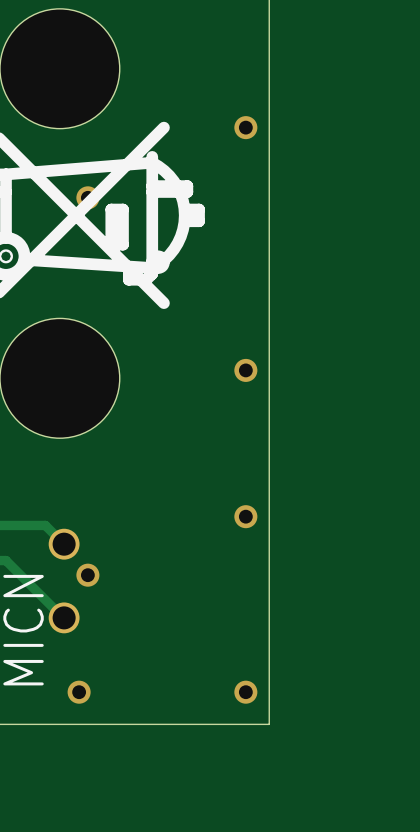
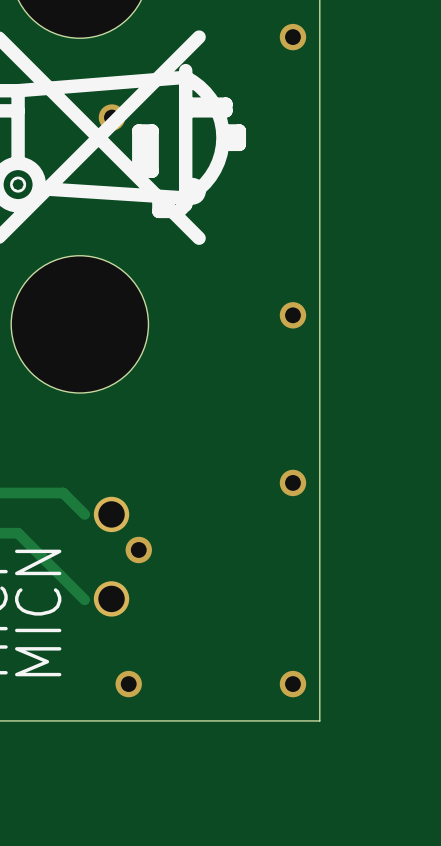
via position: (87, 575) -> (138, 549)
part position: (64, 581) -> (111, 556)
via position: (79, 692) -> (128, 684)

